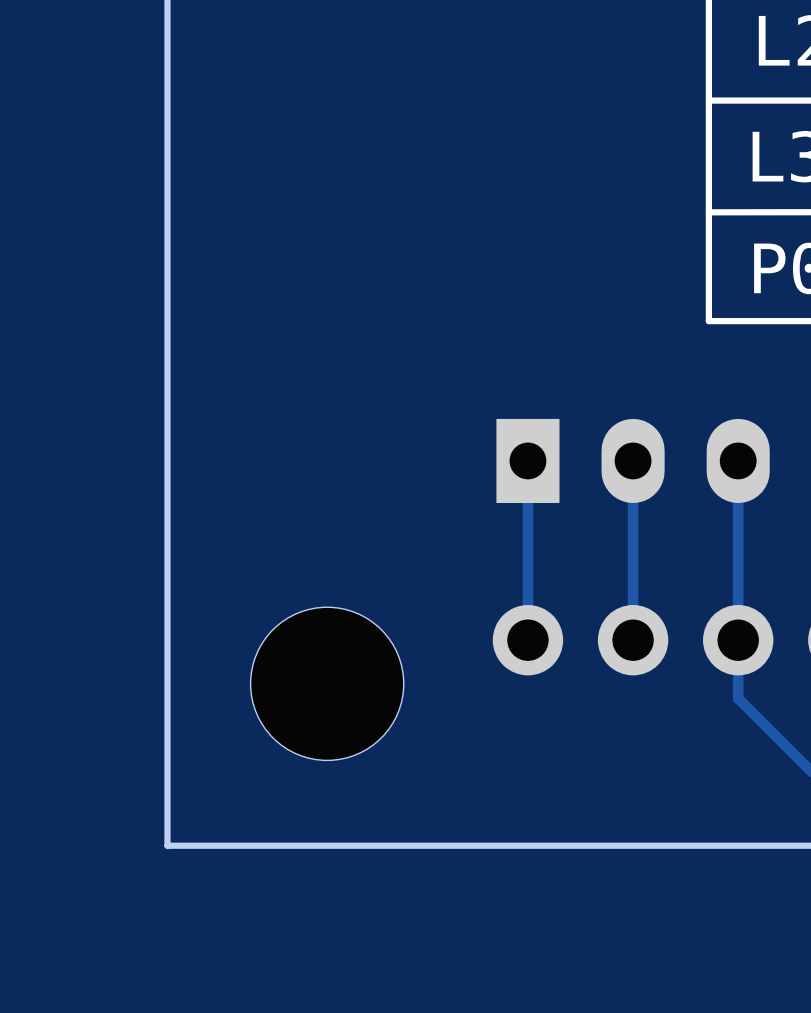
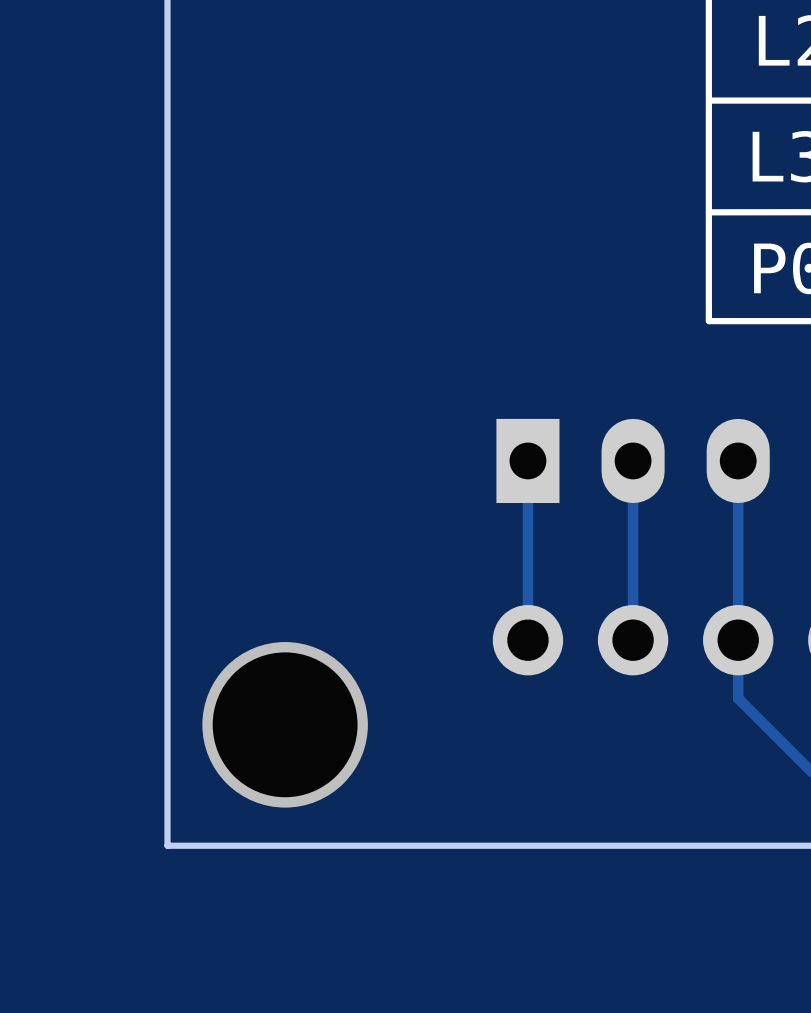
part: (327, 683) -> none
via: none -> (285, 724)

